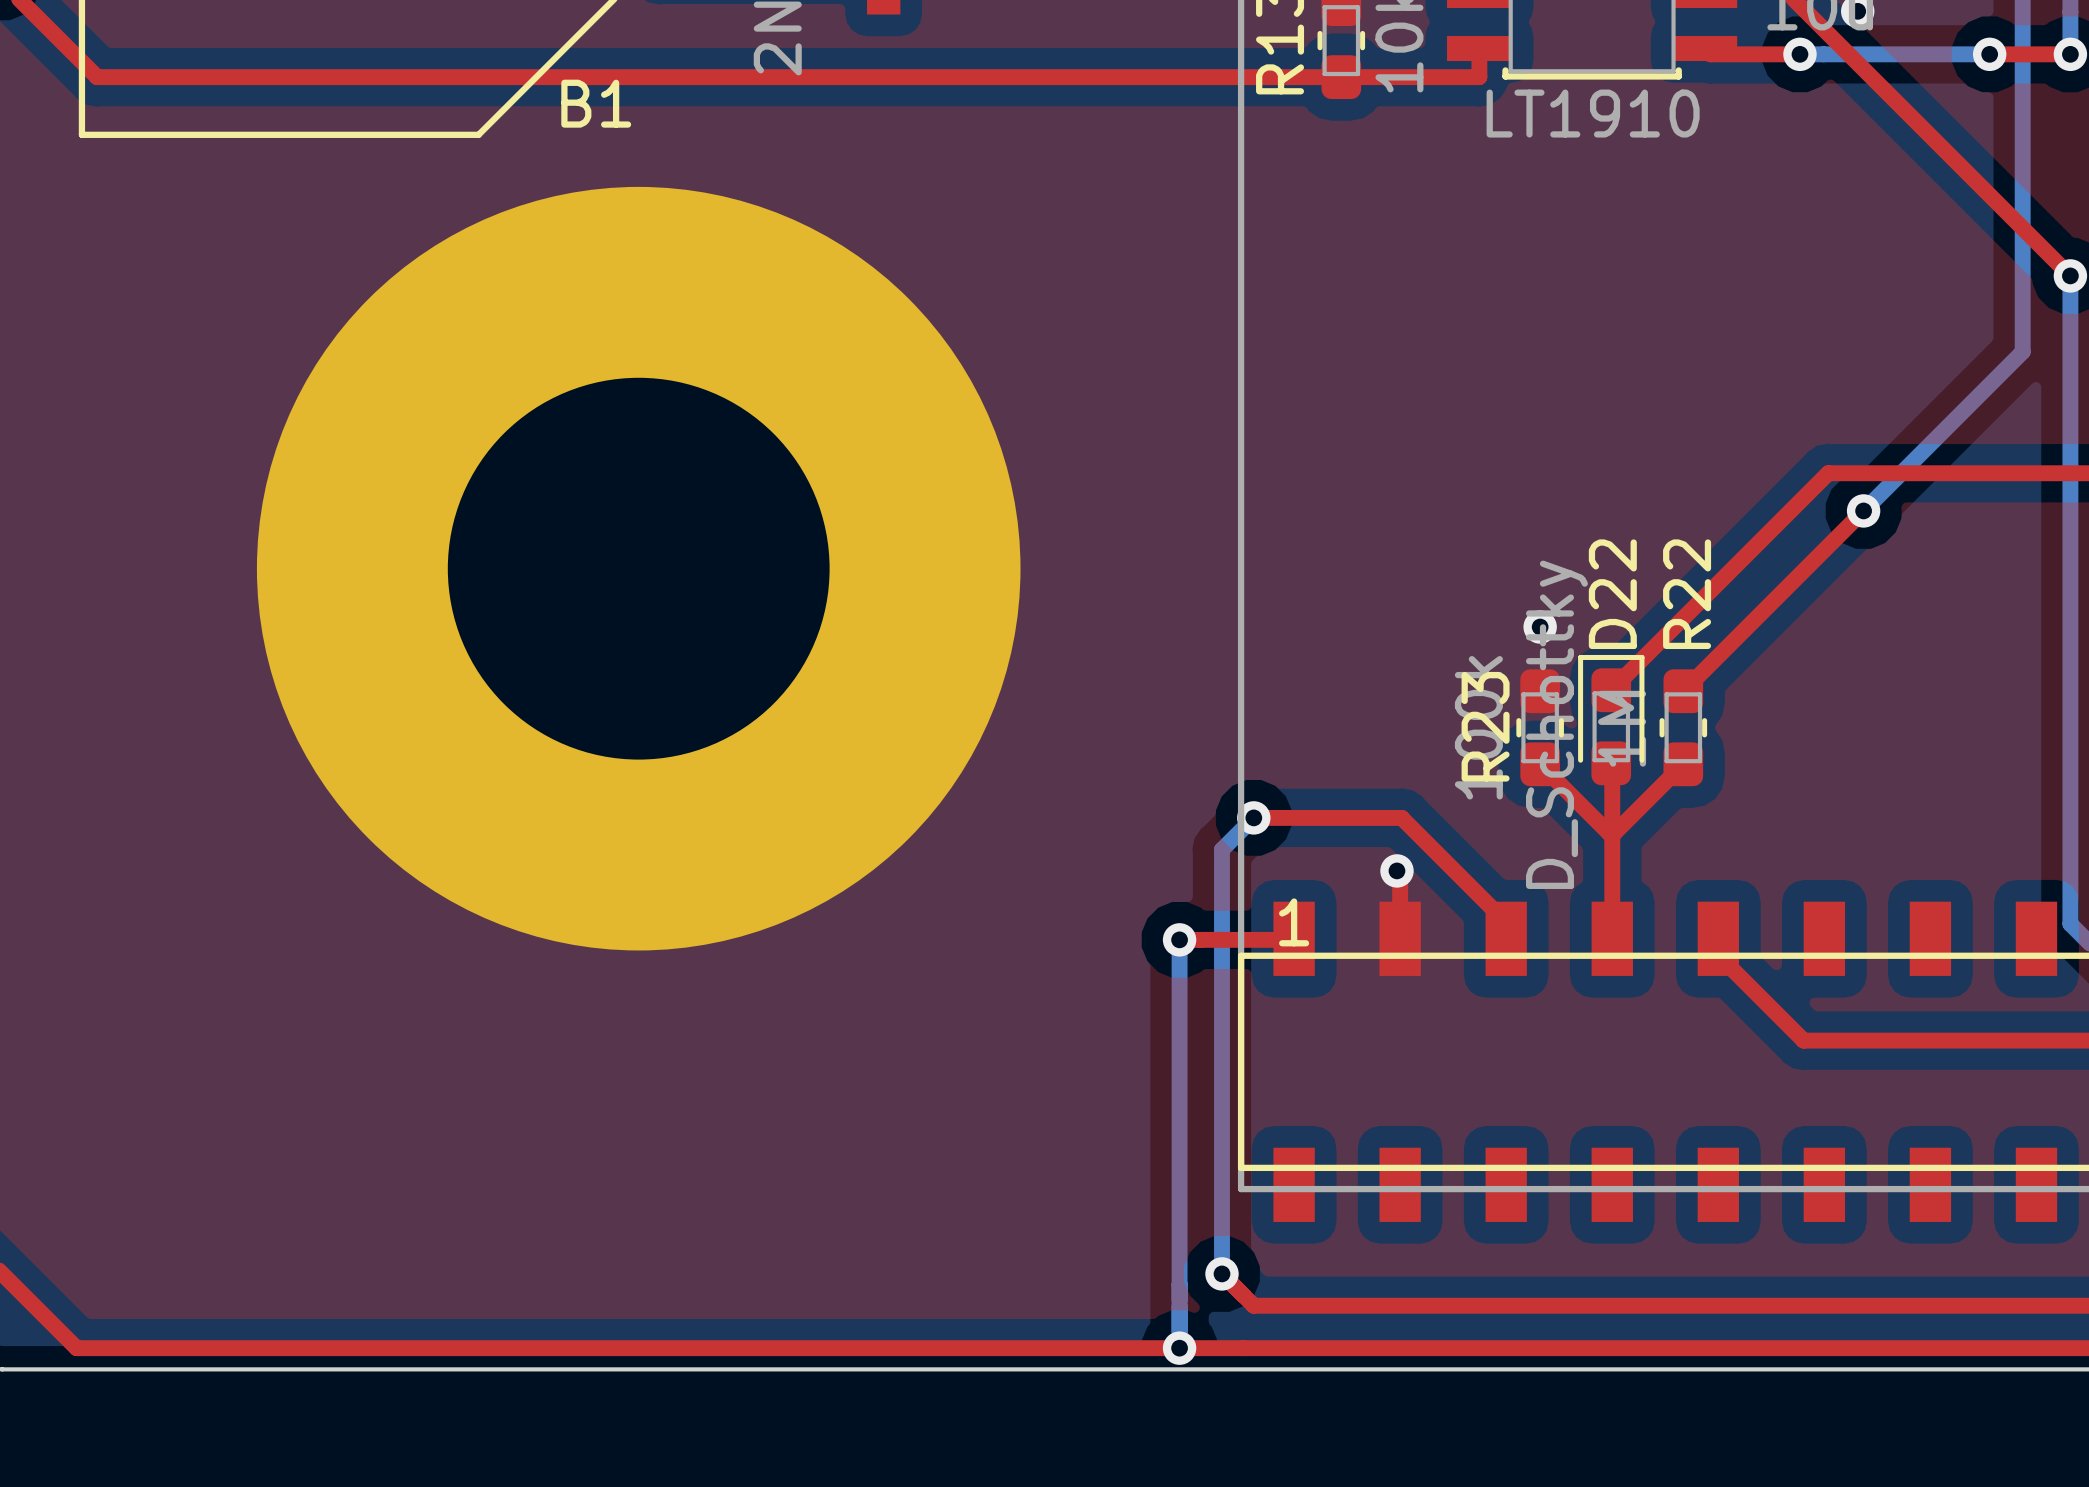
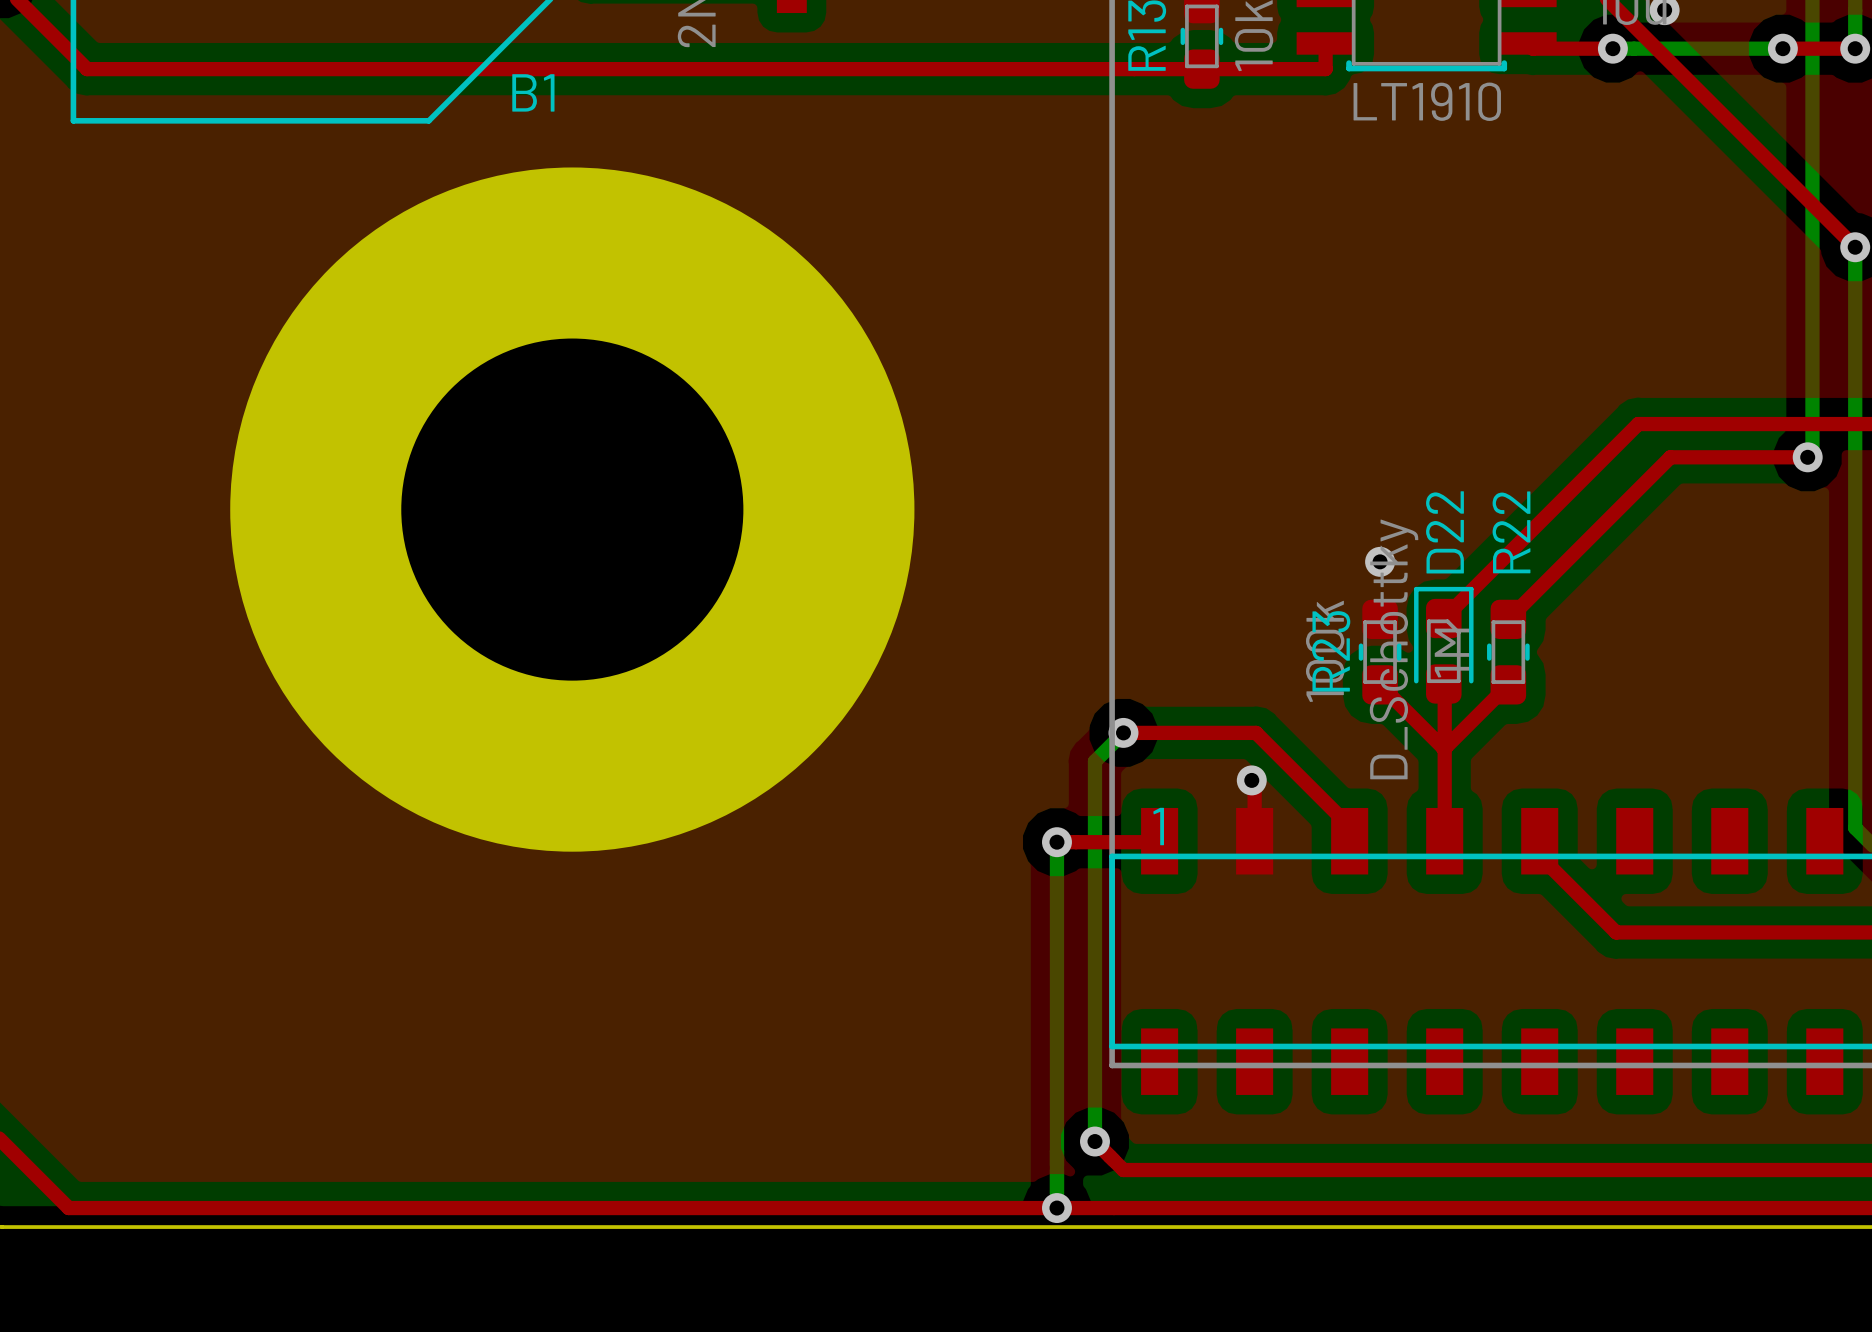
bottom track: (2022, 351) (1863, 510) -> (1812, 315) (1812, 452) (1807, 457)
via position: (1863, 510) -> (1807, 457)
top track: none -> (1670, 457) (1807, 457)

